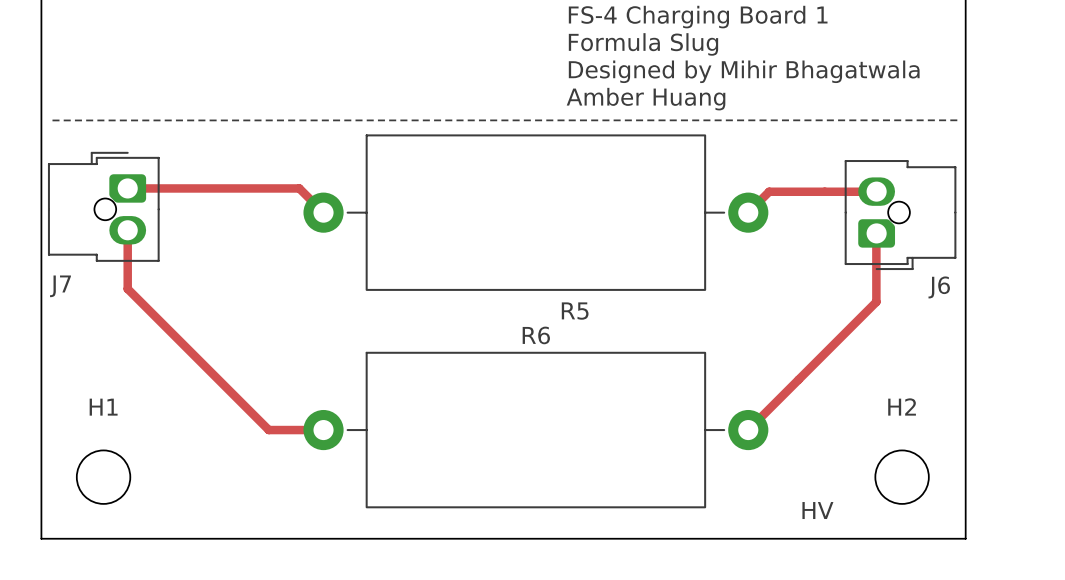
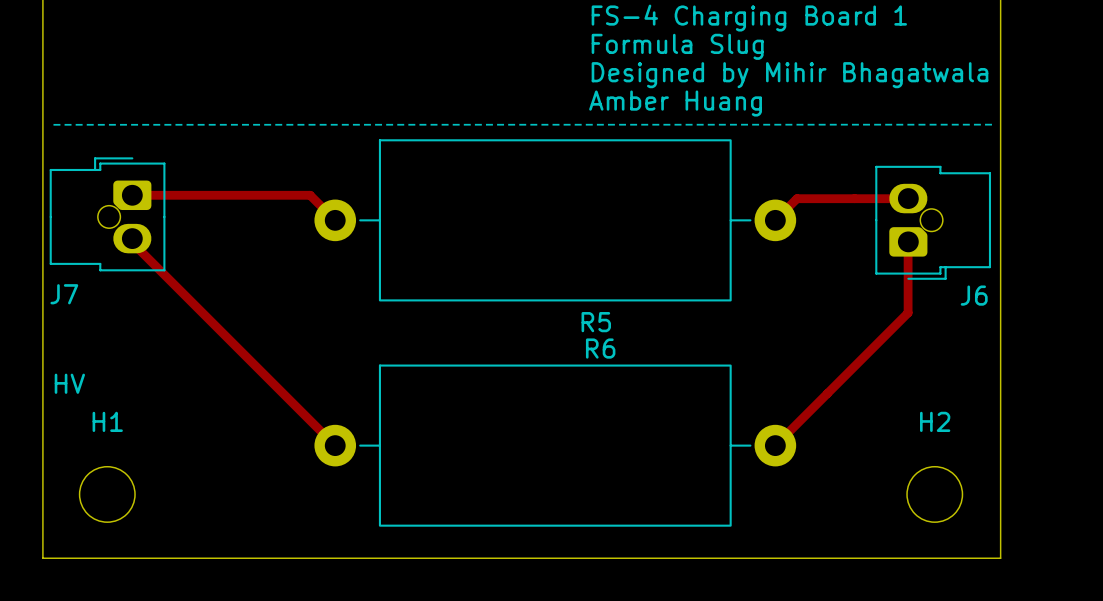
top track: (127, 230) (127, 288) (268, 430) (323, 430) -> (134, 238) (134, 244) (335, 445)
R6 name position: R6 (536, 335) -> R6 (600, 348)
text: none -> HV (69, 383)
text: HV (817, 510) -> none

